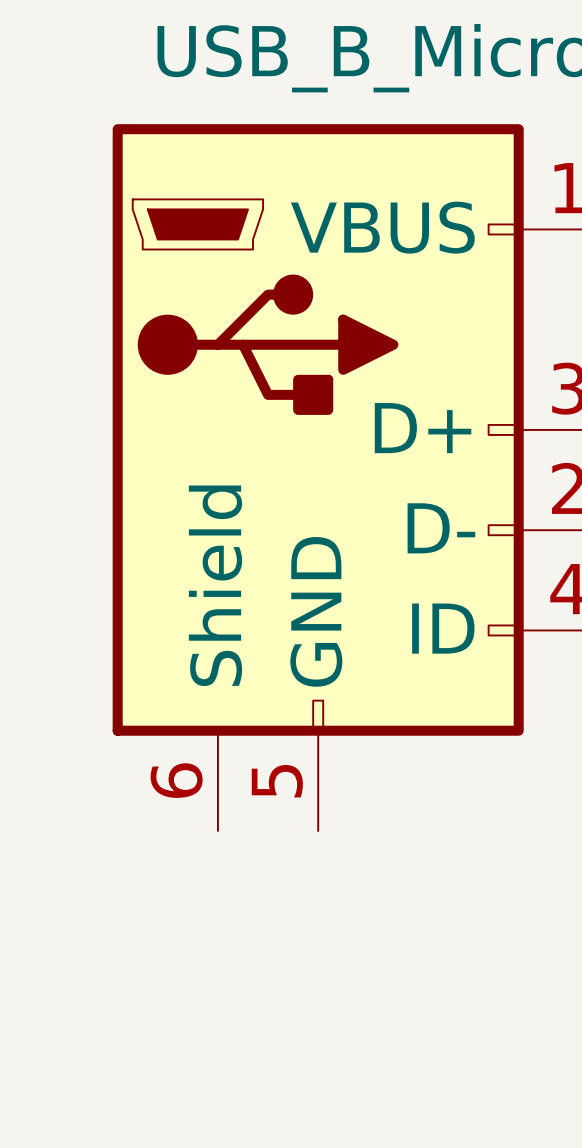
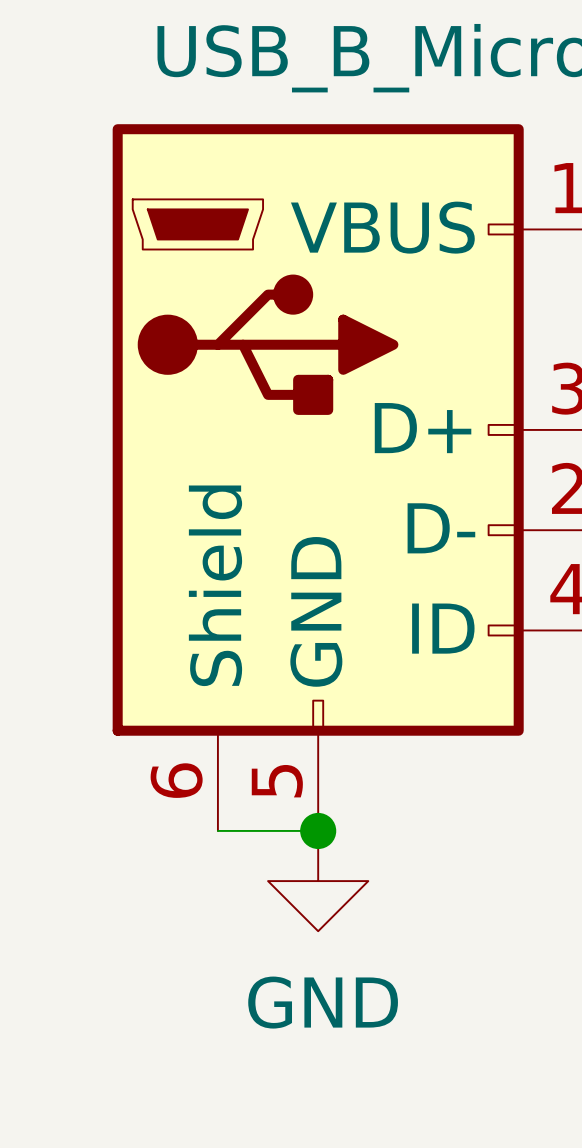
wire: none -> (217, 830) (318, 830)
junction: none -> (318, 830)
power symbol: none -> GND (318, 881)

